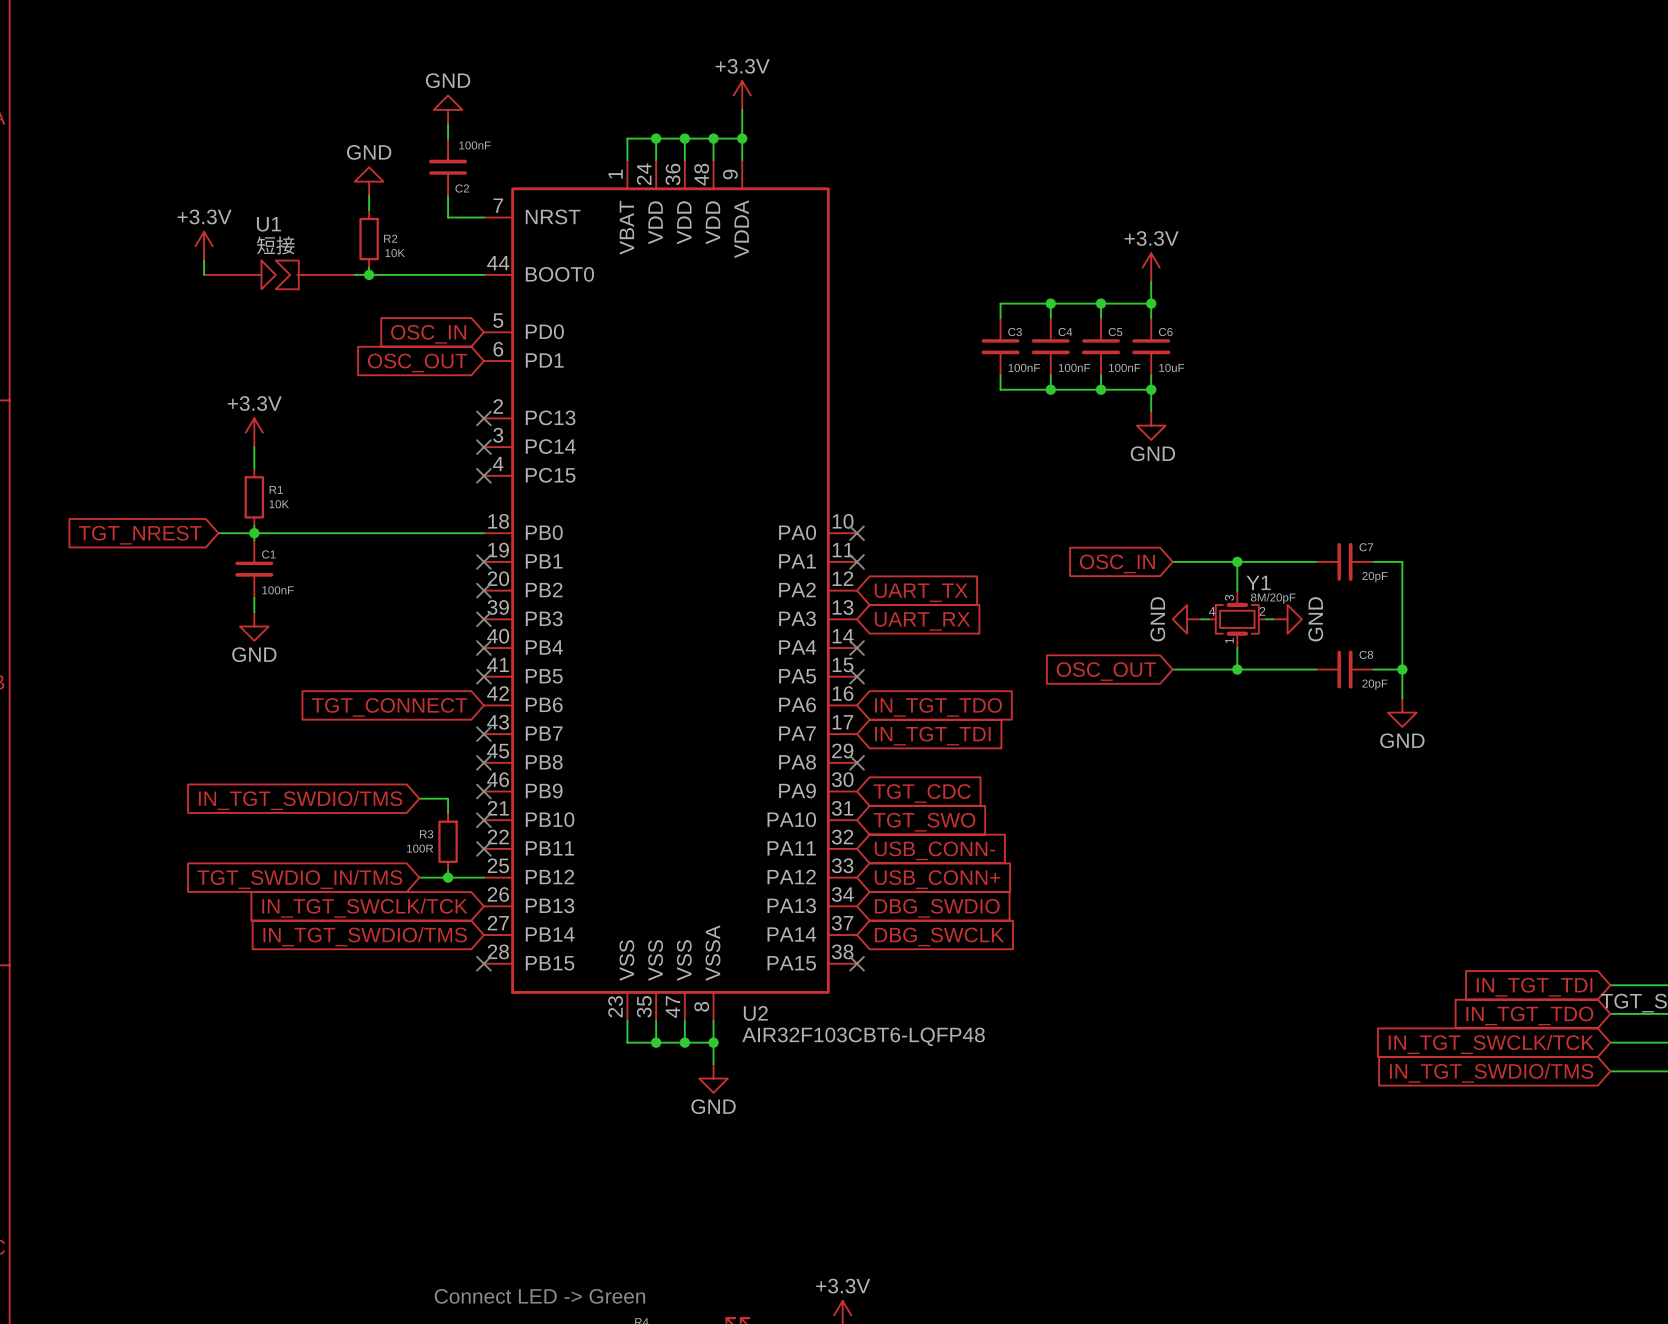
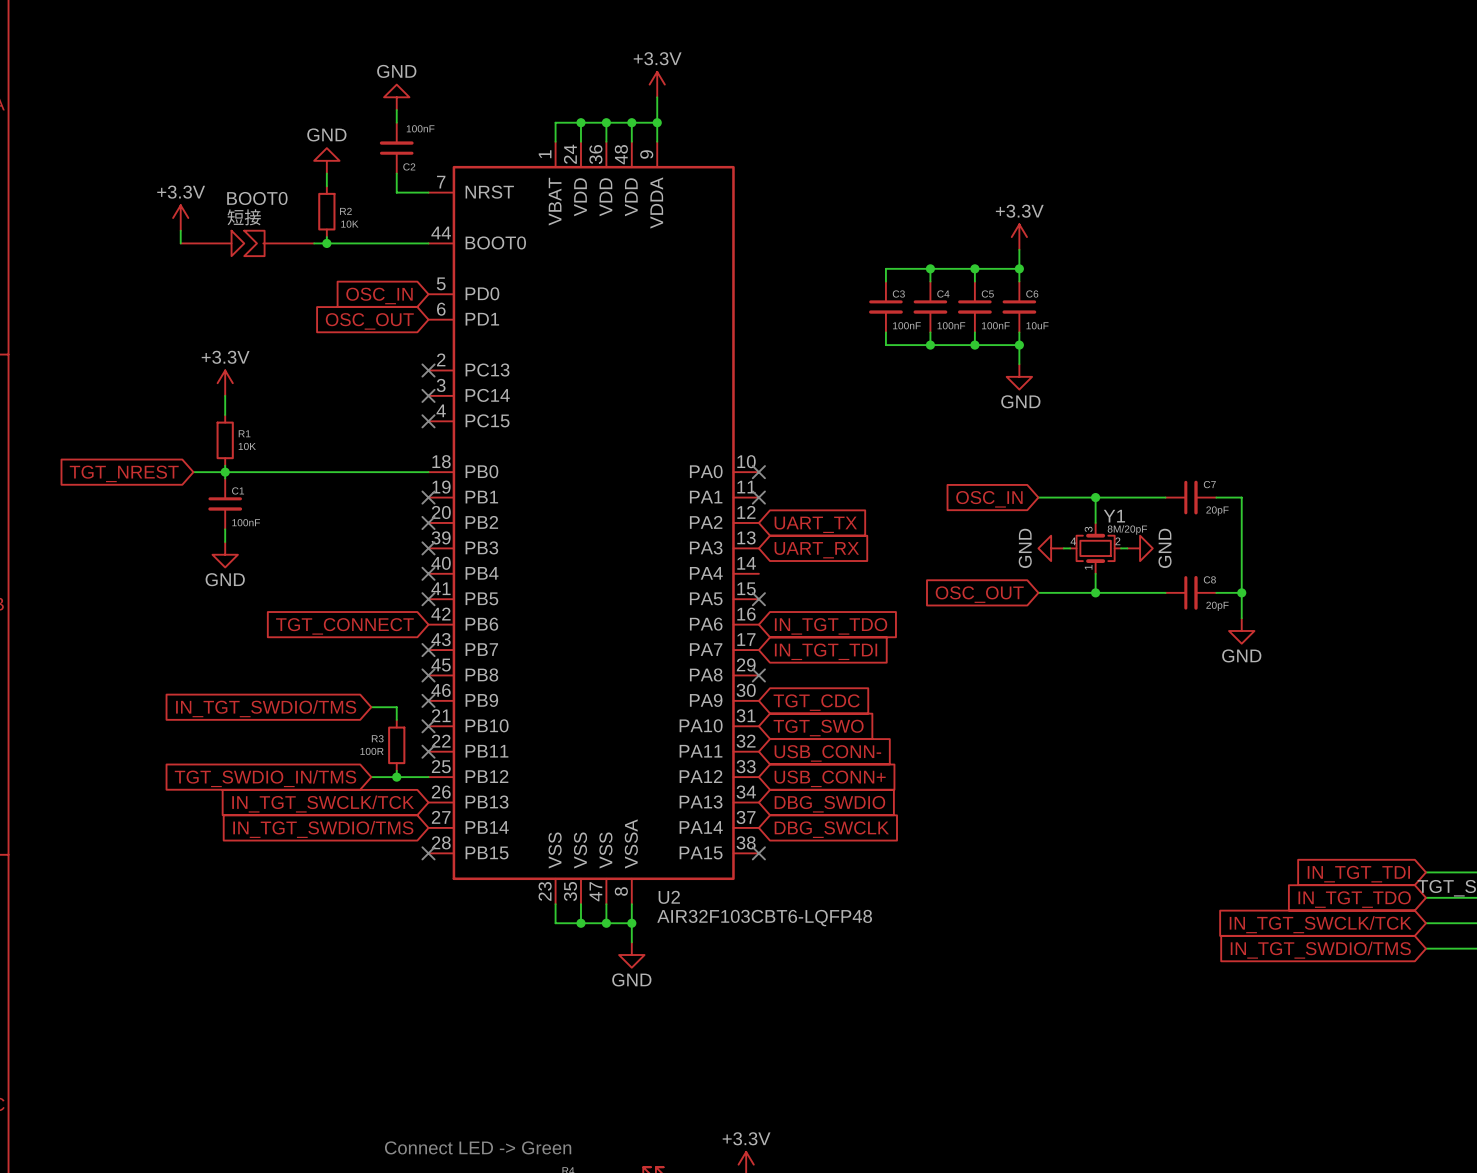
U1 name: U1 (268, 224) -> BOOT0 (257, 198)
no-connect mark: (857, 648) -> none

